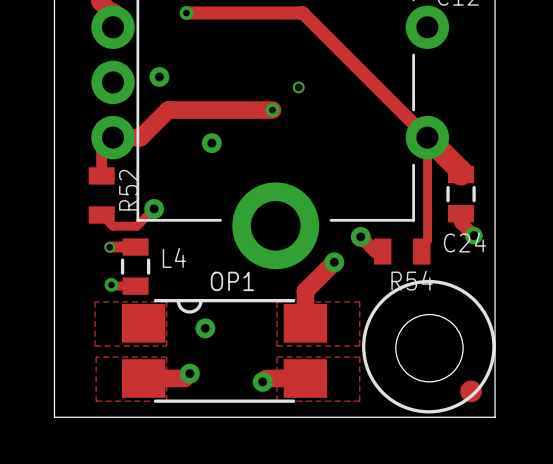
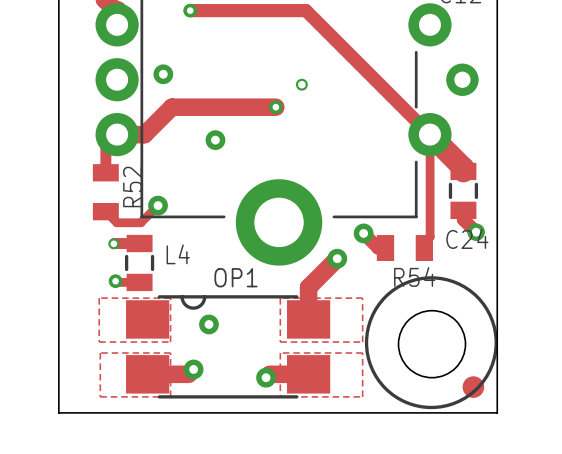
part: none -> (462, 79)

